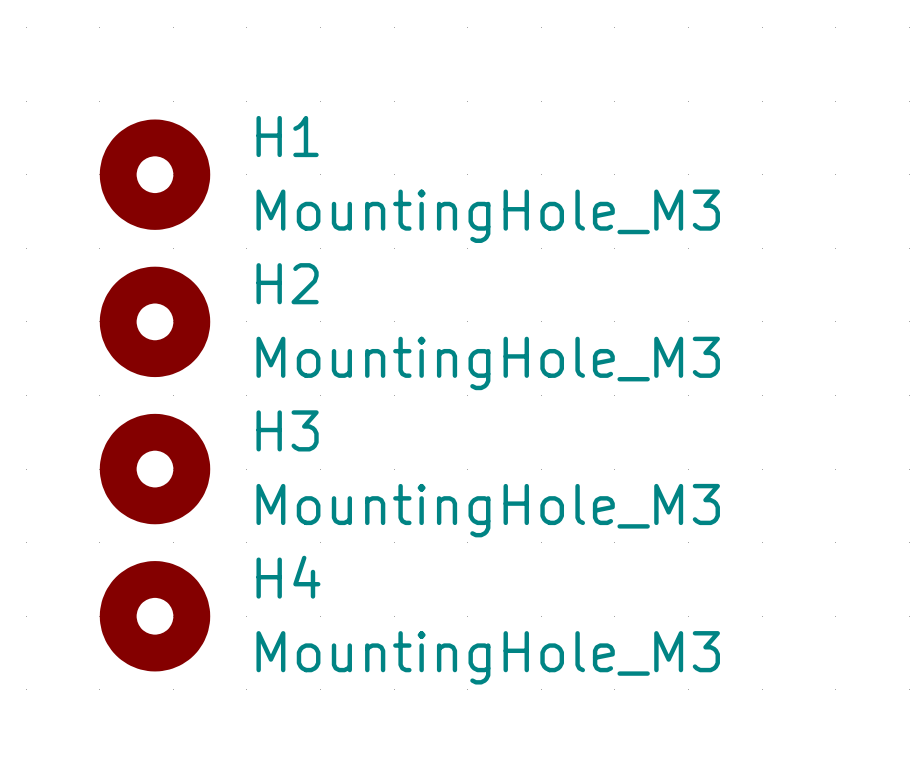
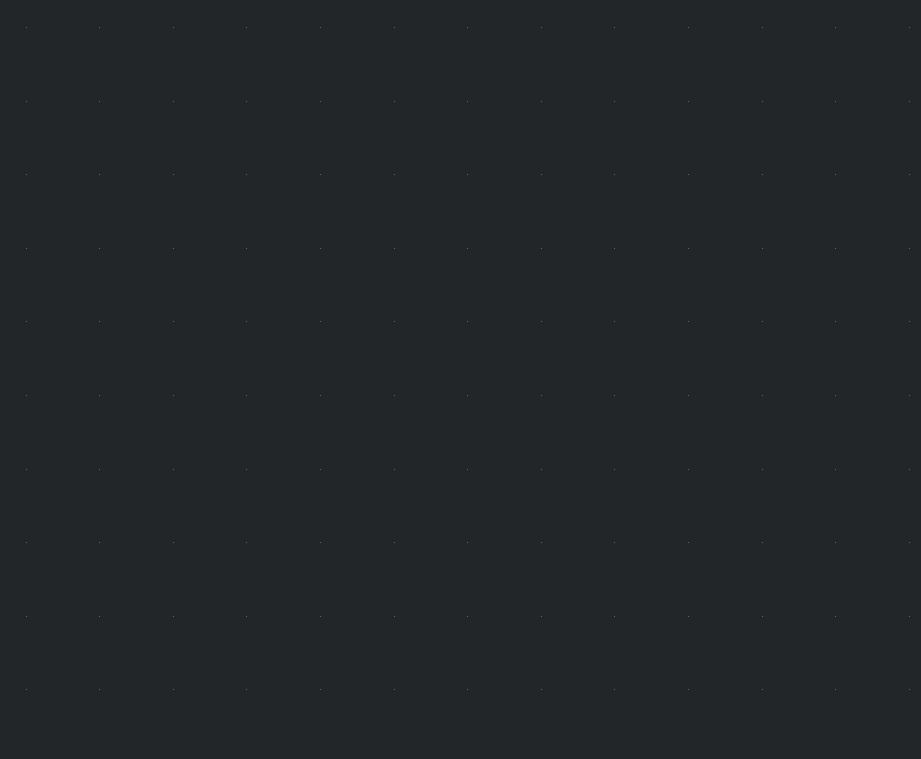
H1: MountingHole_M3 (155, 174) -> none
H2: MountingHole_M3 (155, 321) -> none
H3: MountingHole_M3 (155, 469) -> none
H4: MountingHole_M3 (155, 616) -> none

